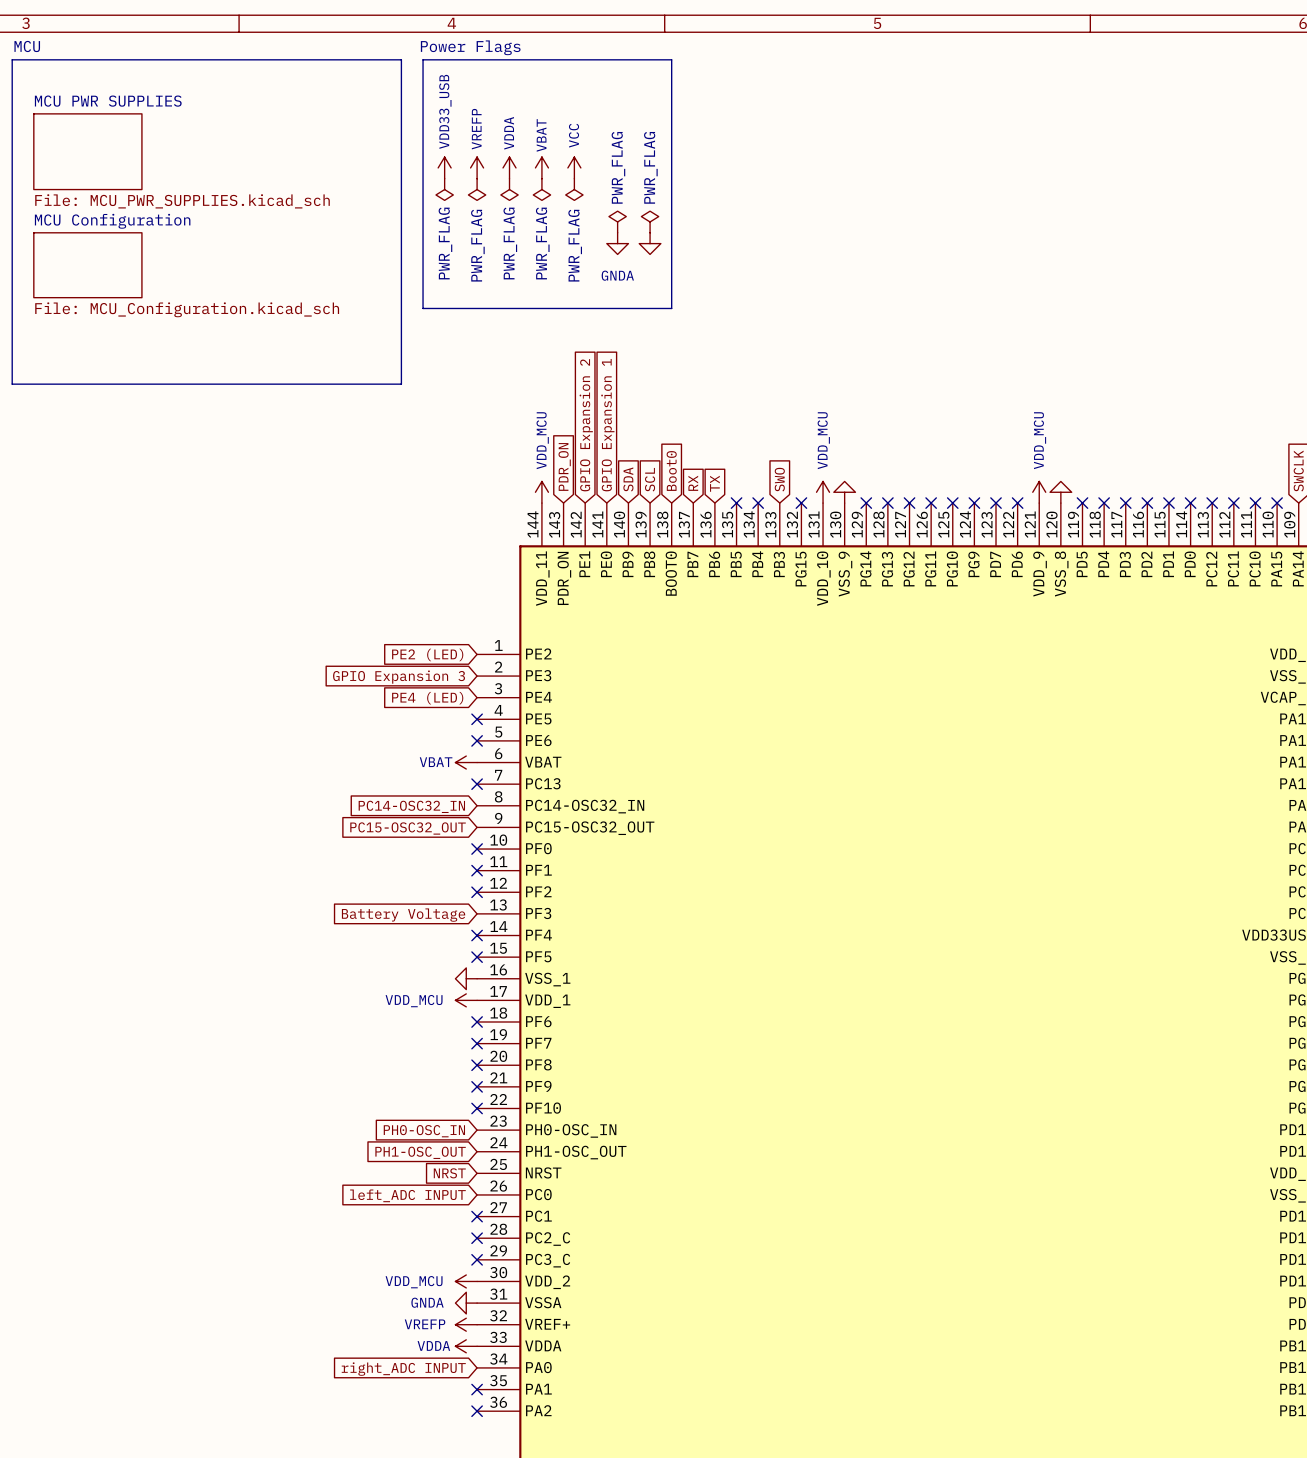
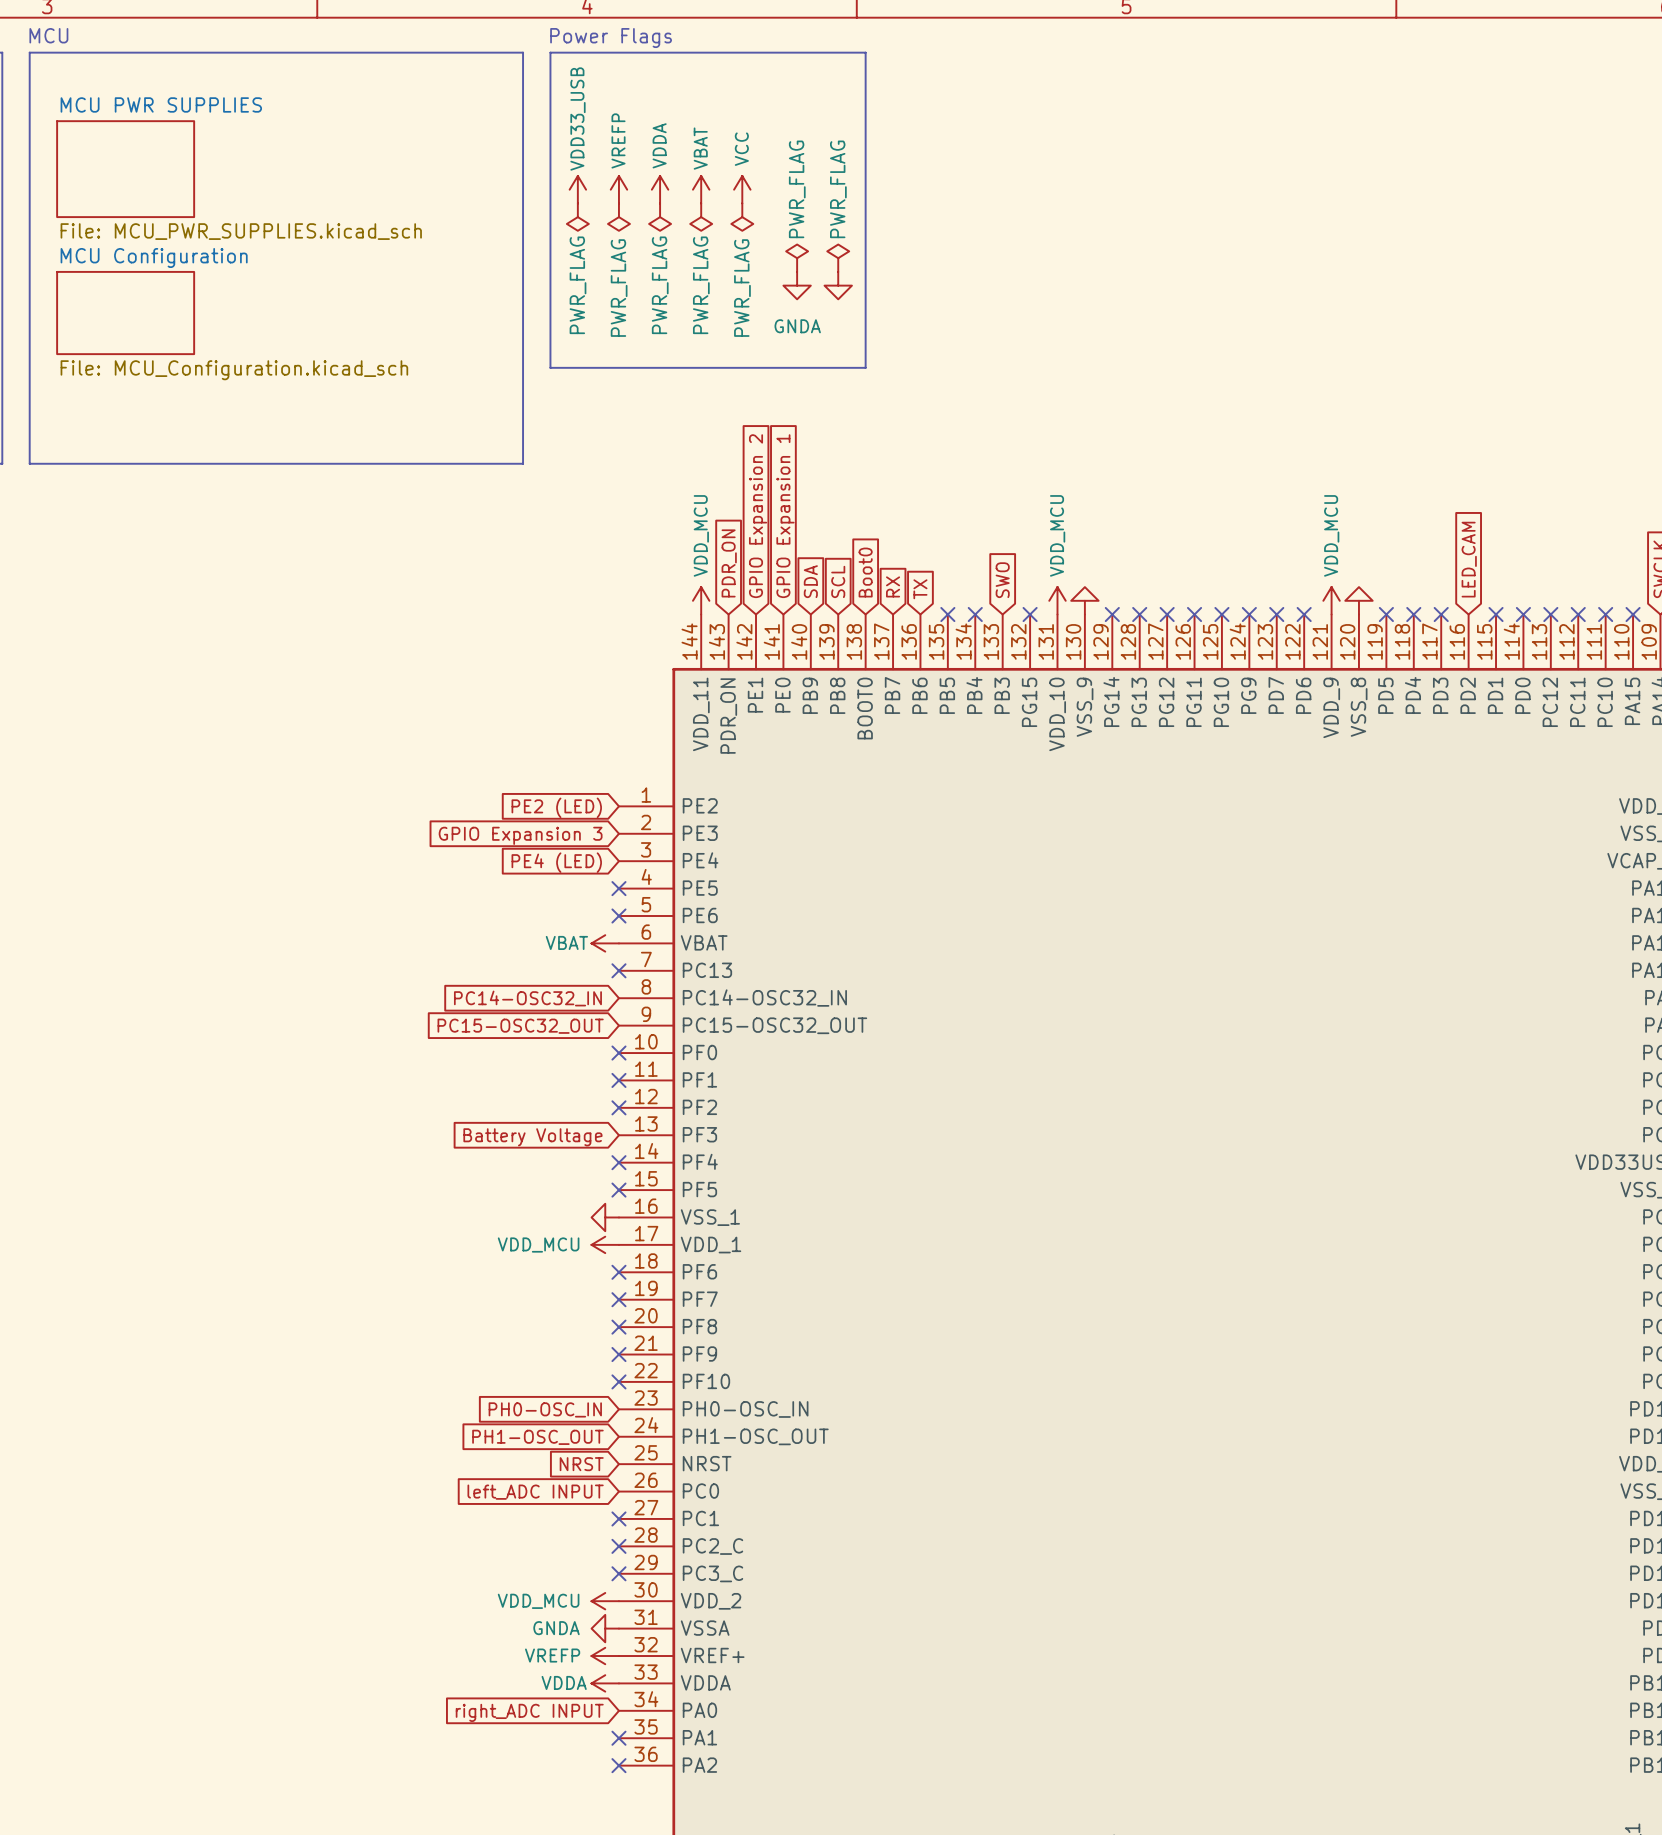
global label: none -> LED_CAM (1469, 559)
no-connect mark: (1147, 503) -> none

